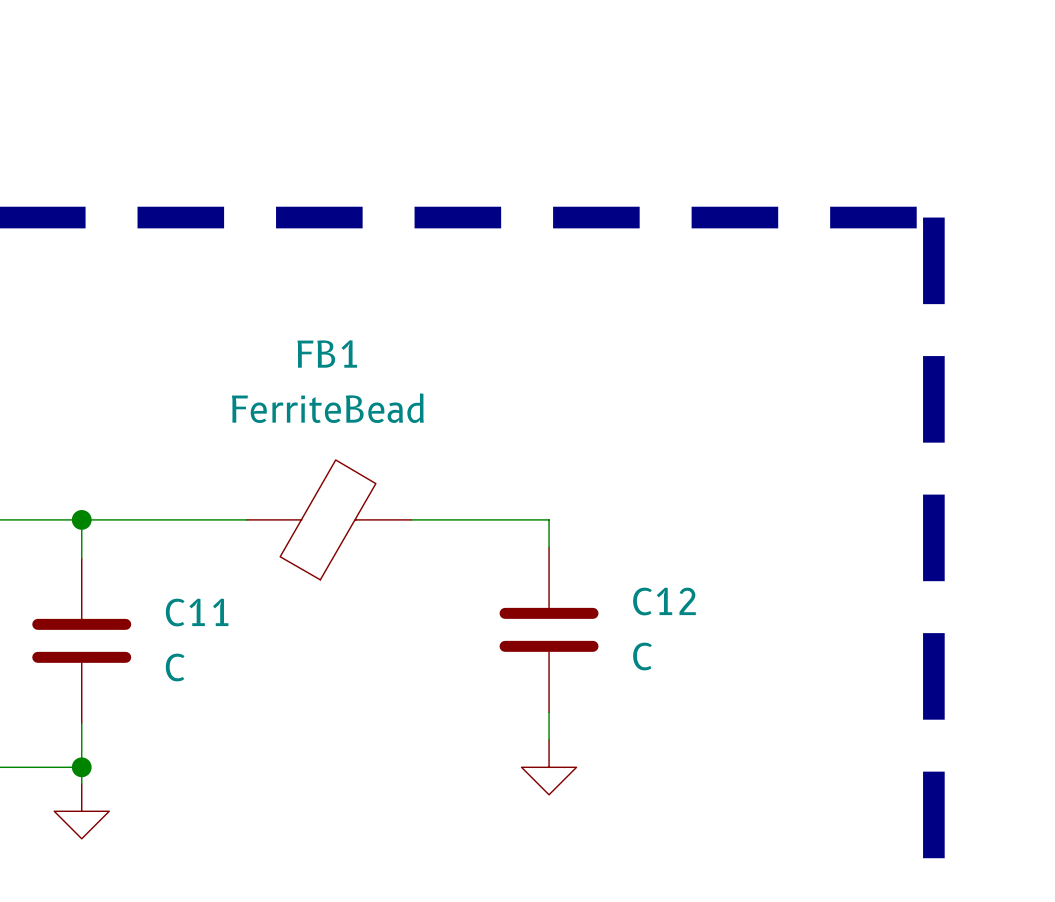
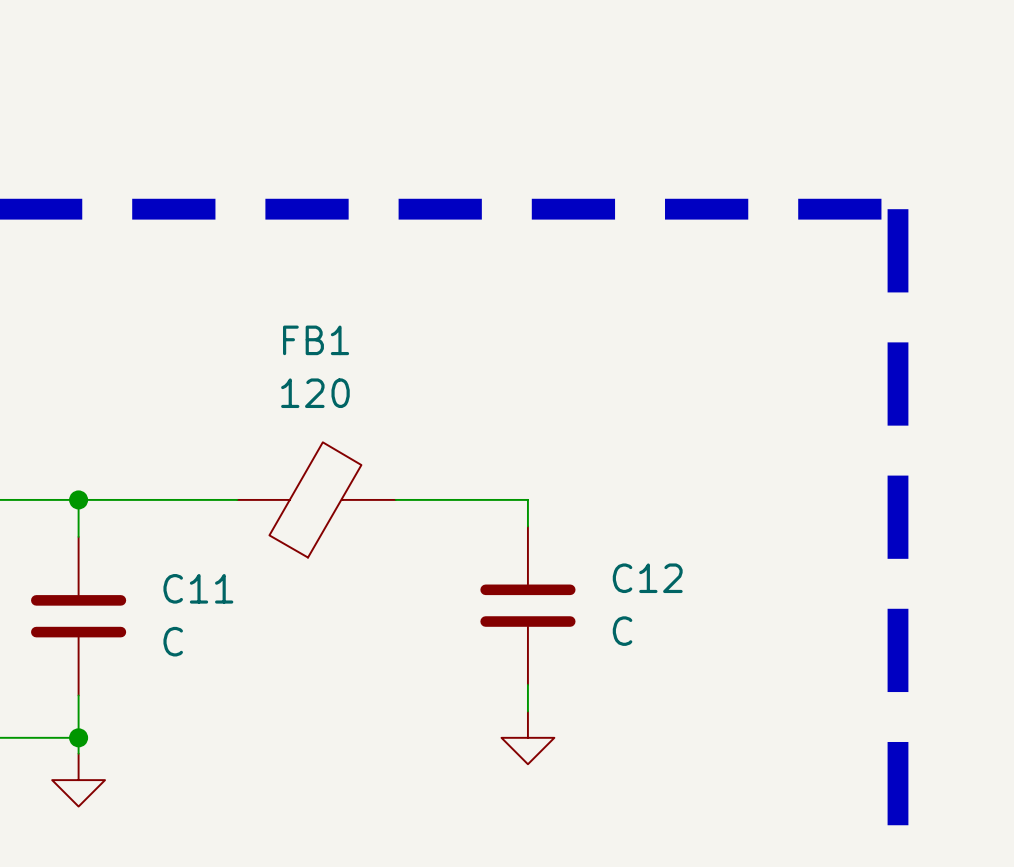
FB1 value: FerriteBead (327, 408) -> 120 (315, 393)

